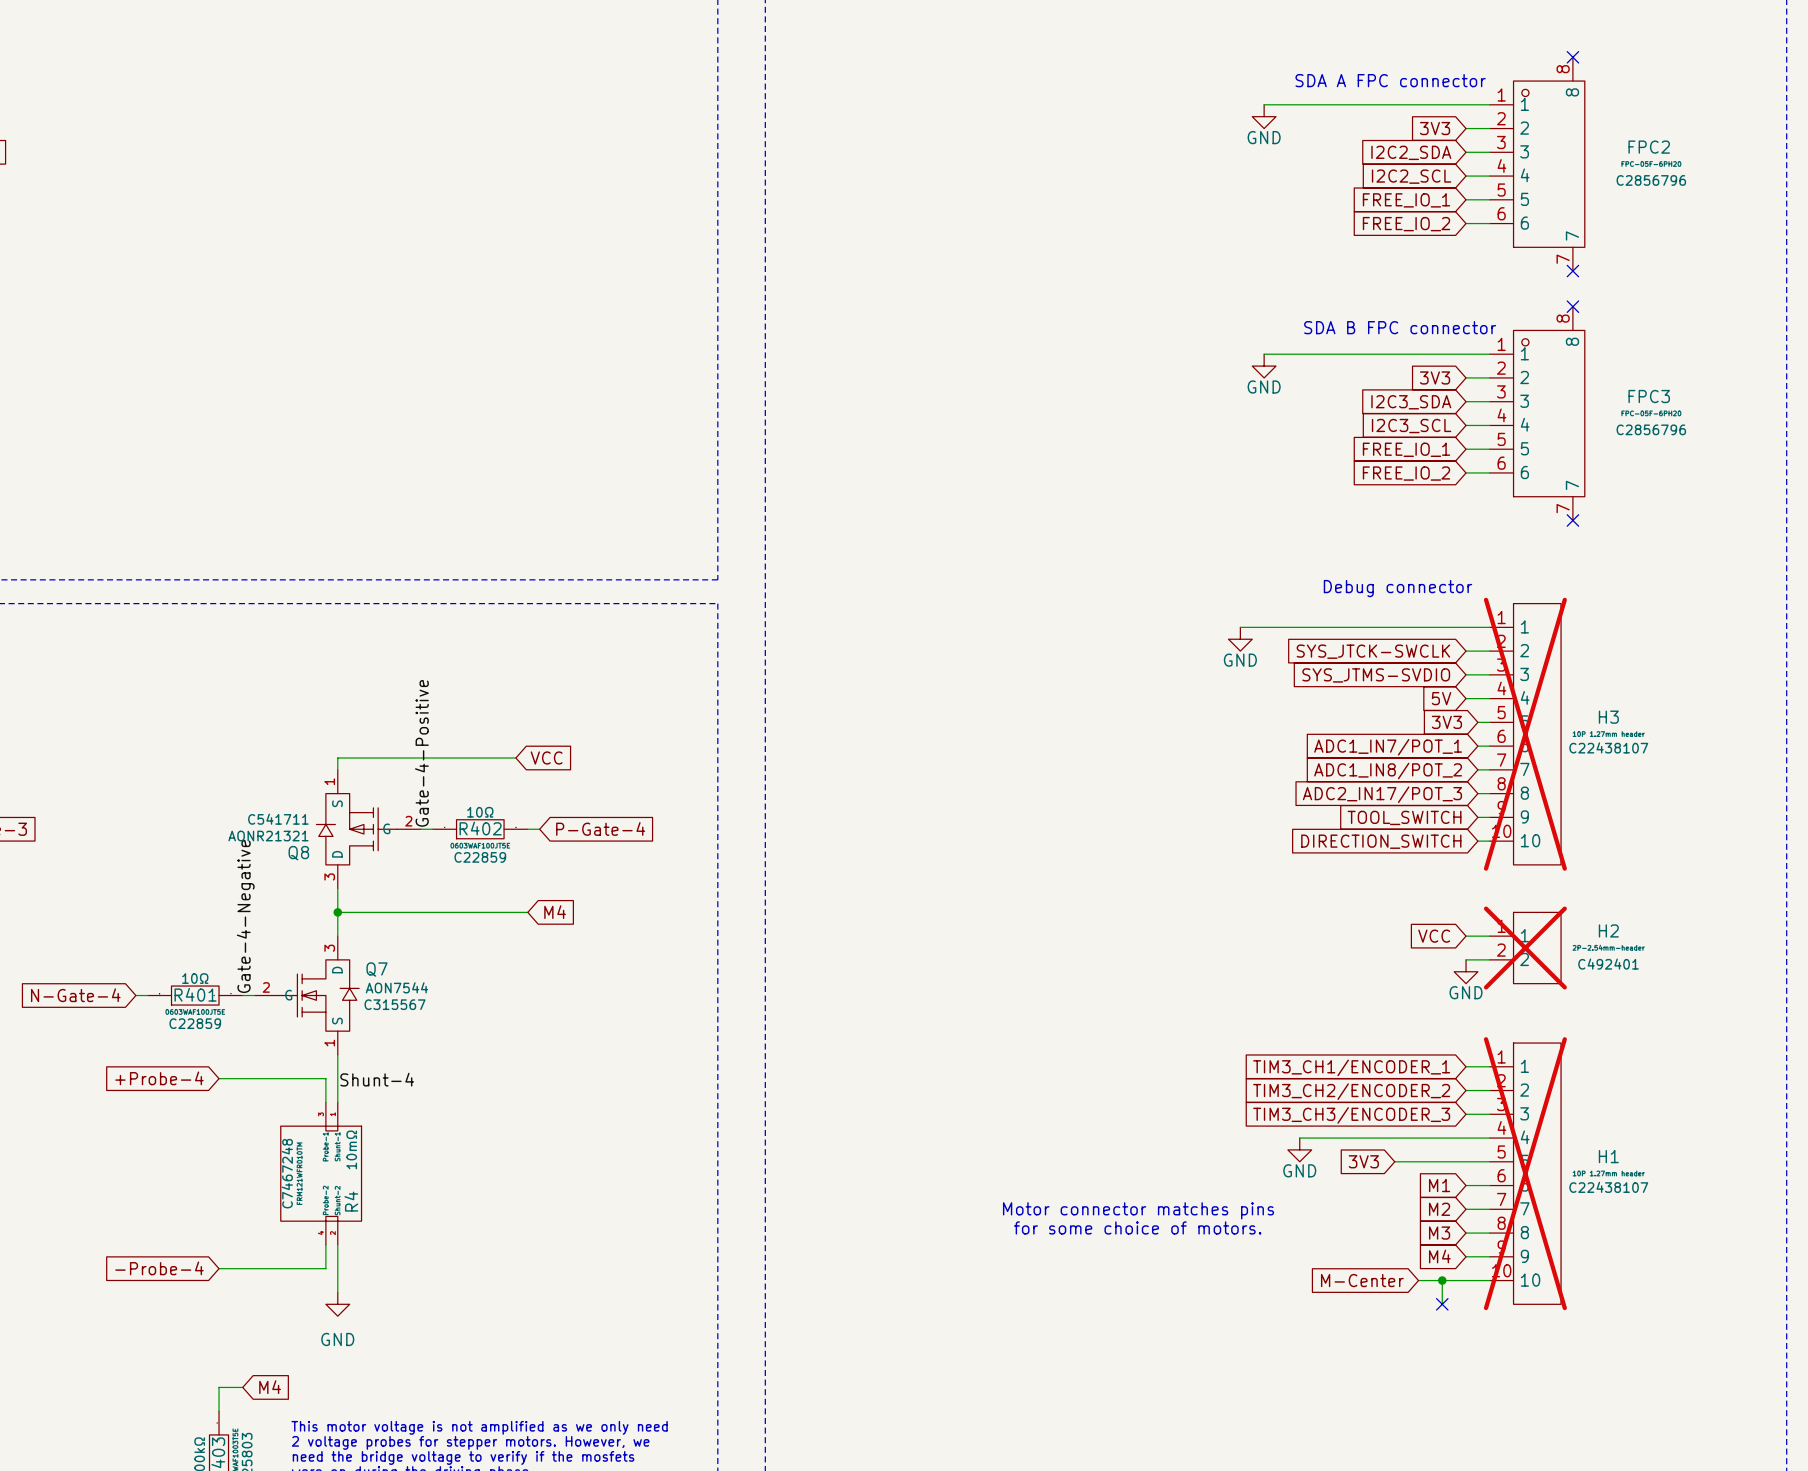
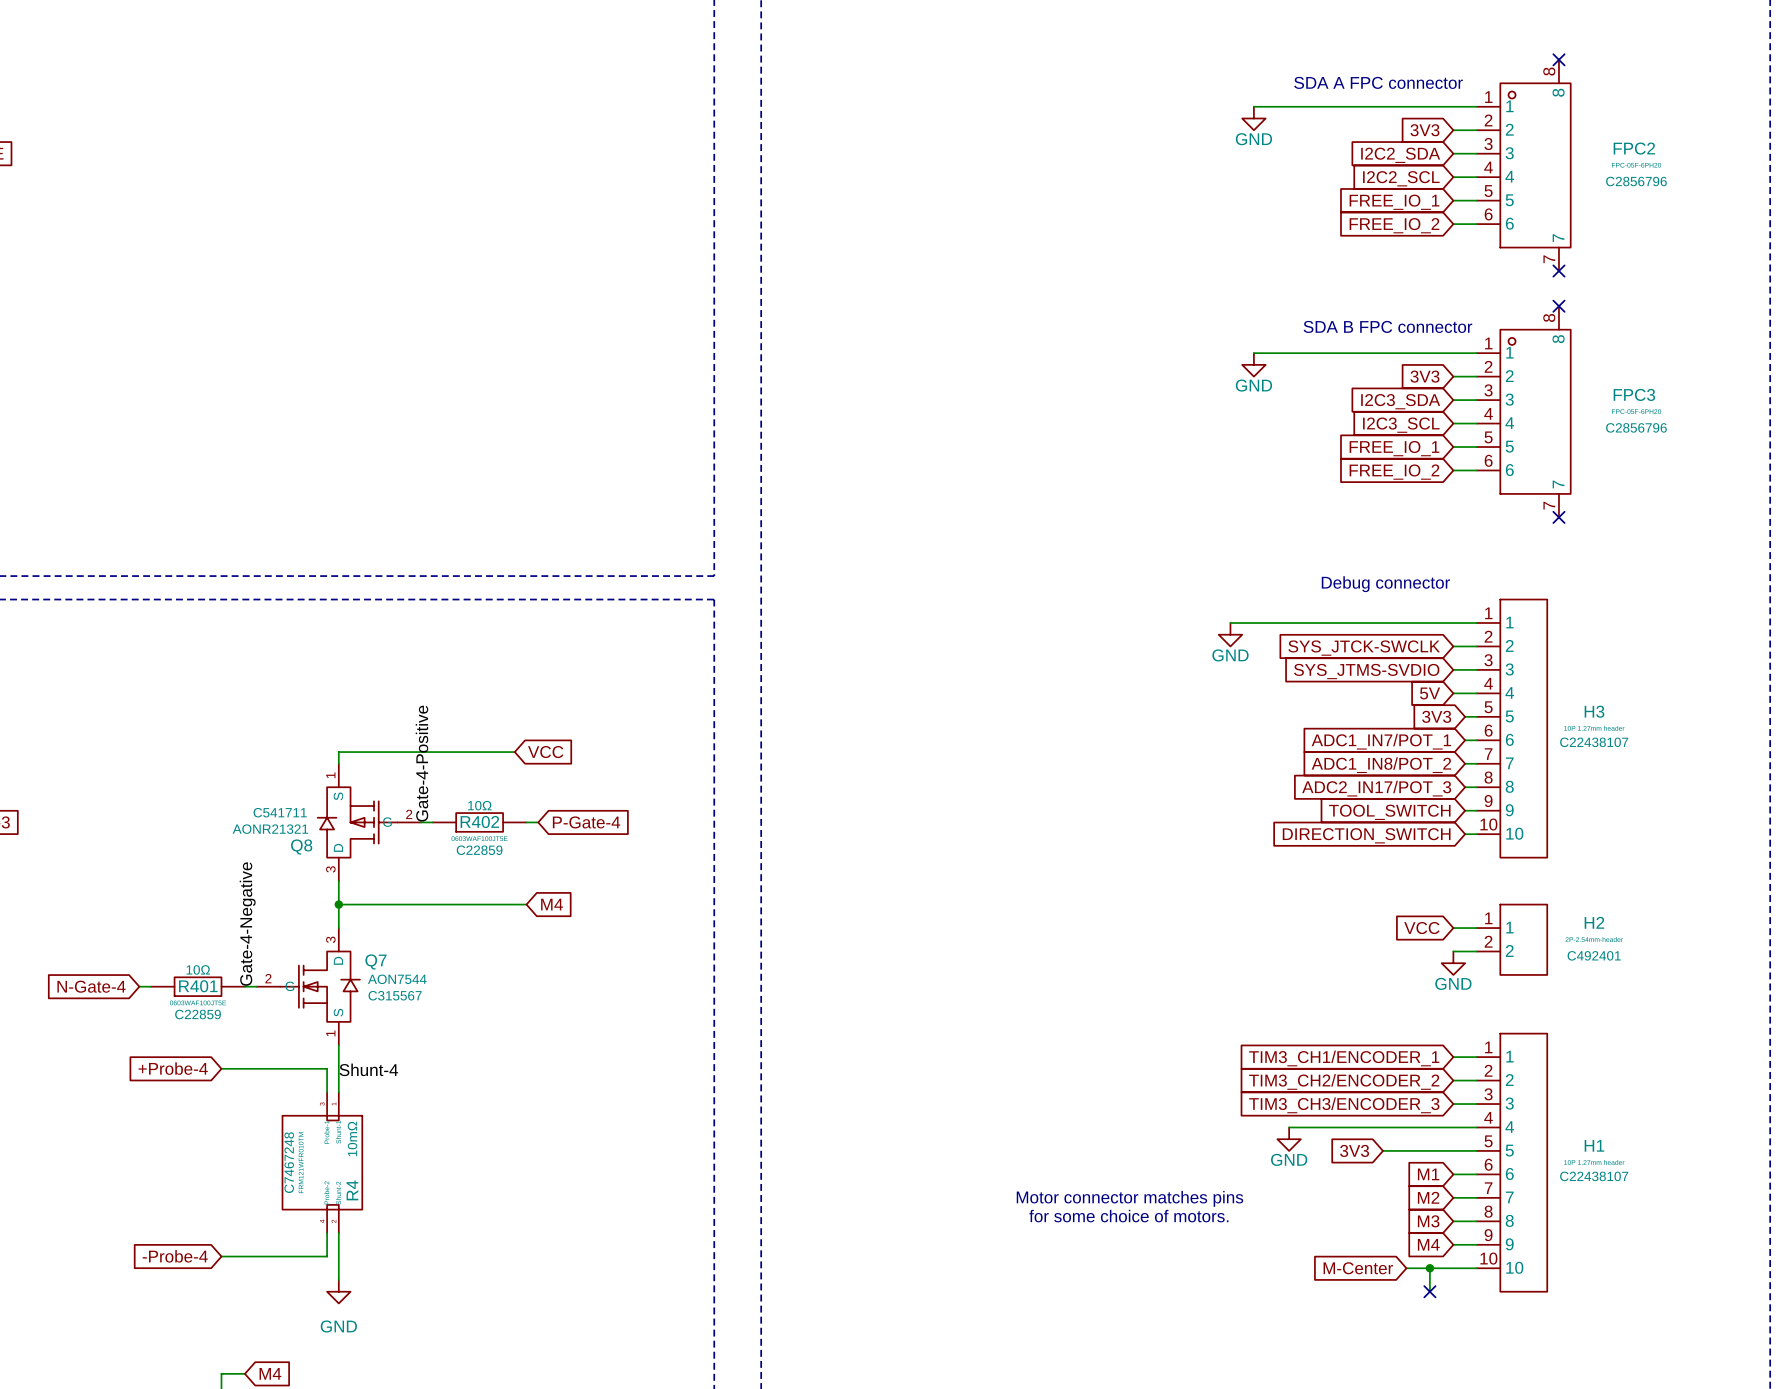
H3 do-not-place cross: (1525, 734) -> none
H2 do-not-place cross: (1525, 948) -> none
H1 do-not-place cross: (1525, 1173) -> none

